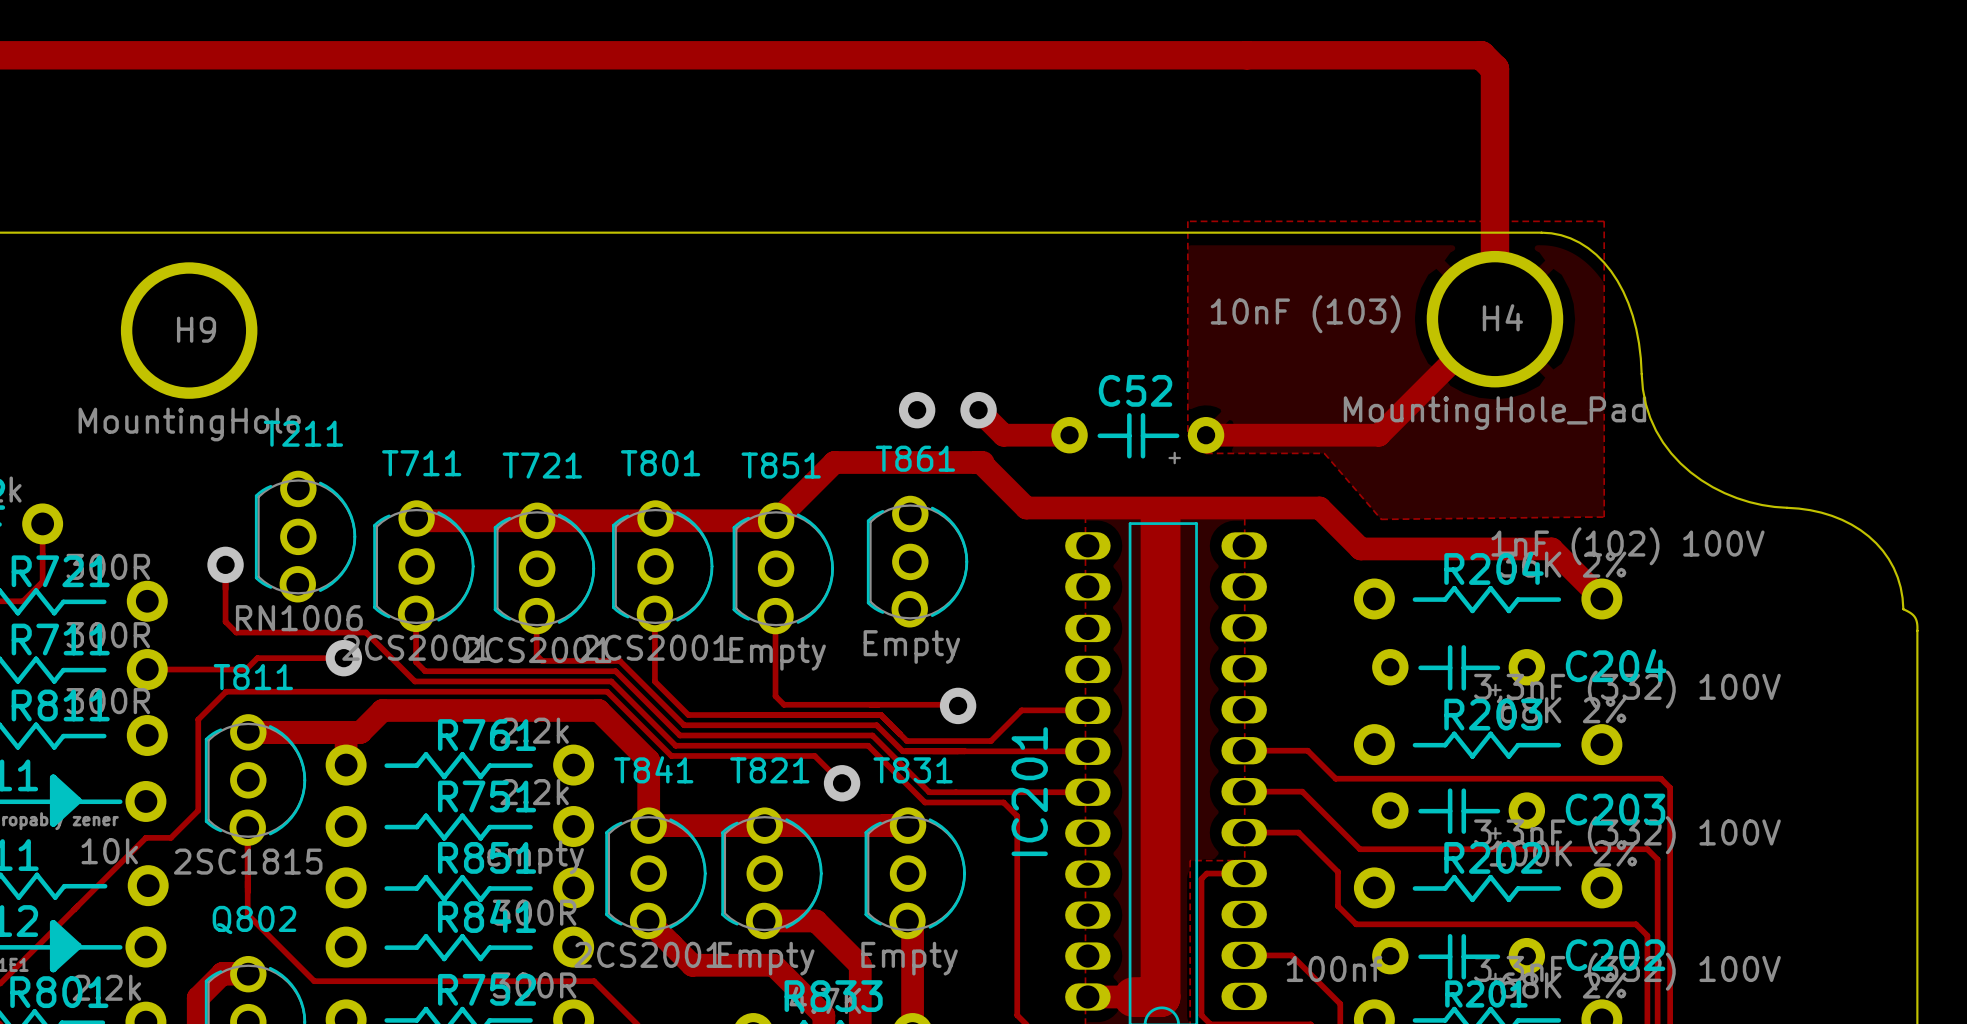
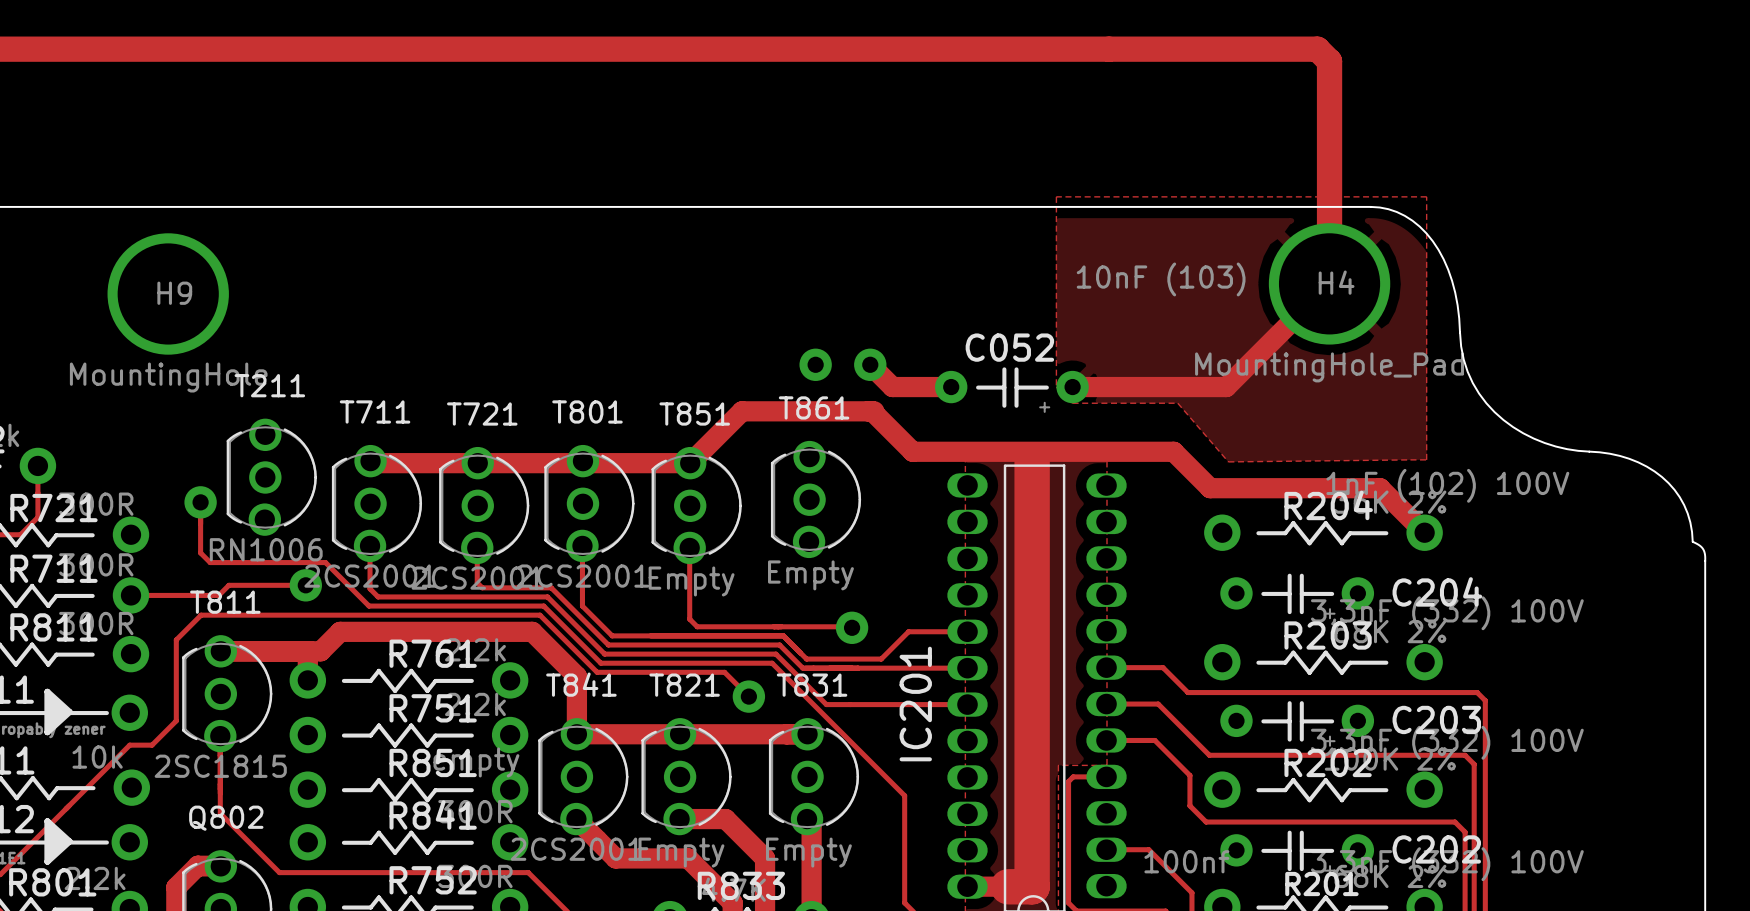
C52 name: C52 (1135, 390) -> C052 (1009, 347)
track: (924, 802) (1003, 802) (1017, 816) (1017, 894) -> (822, 713) (904, 795)

